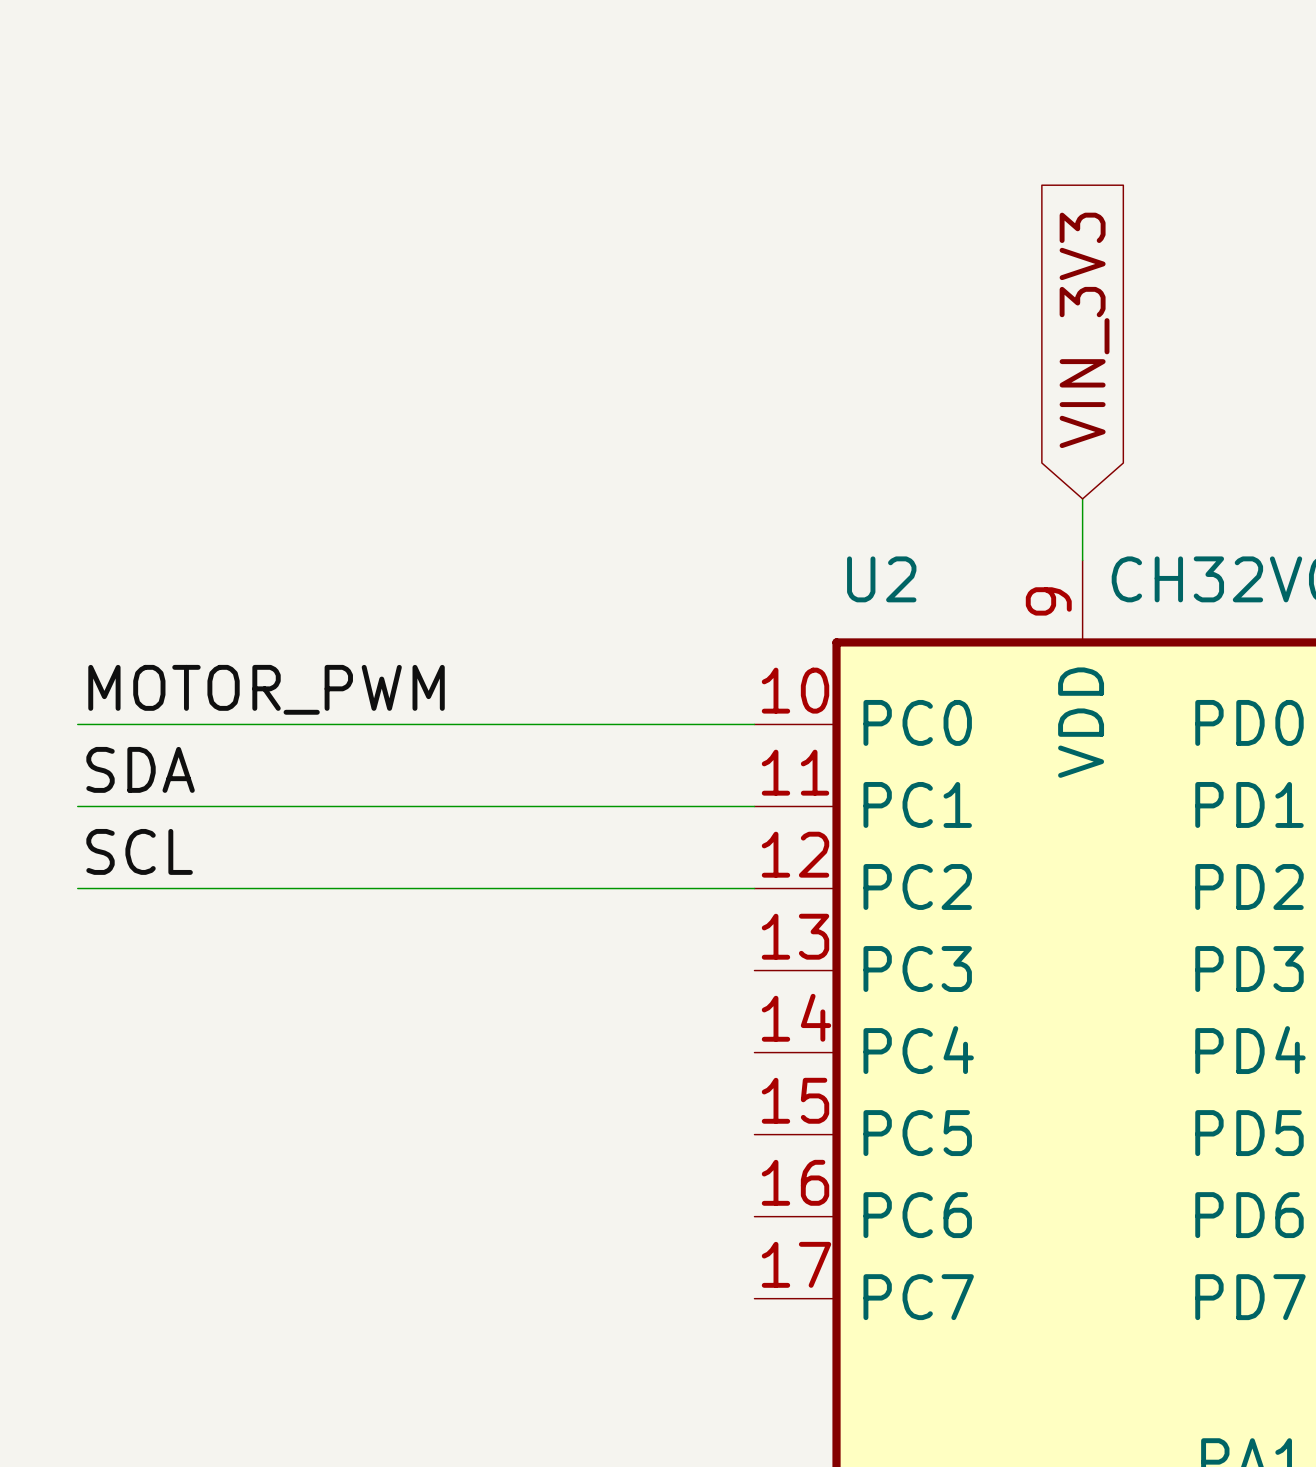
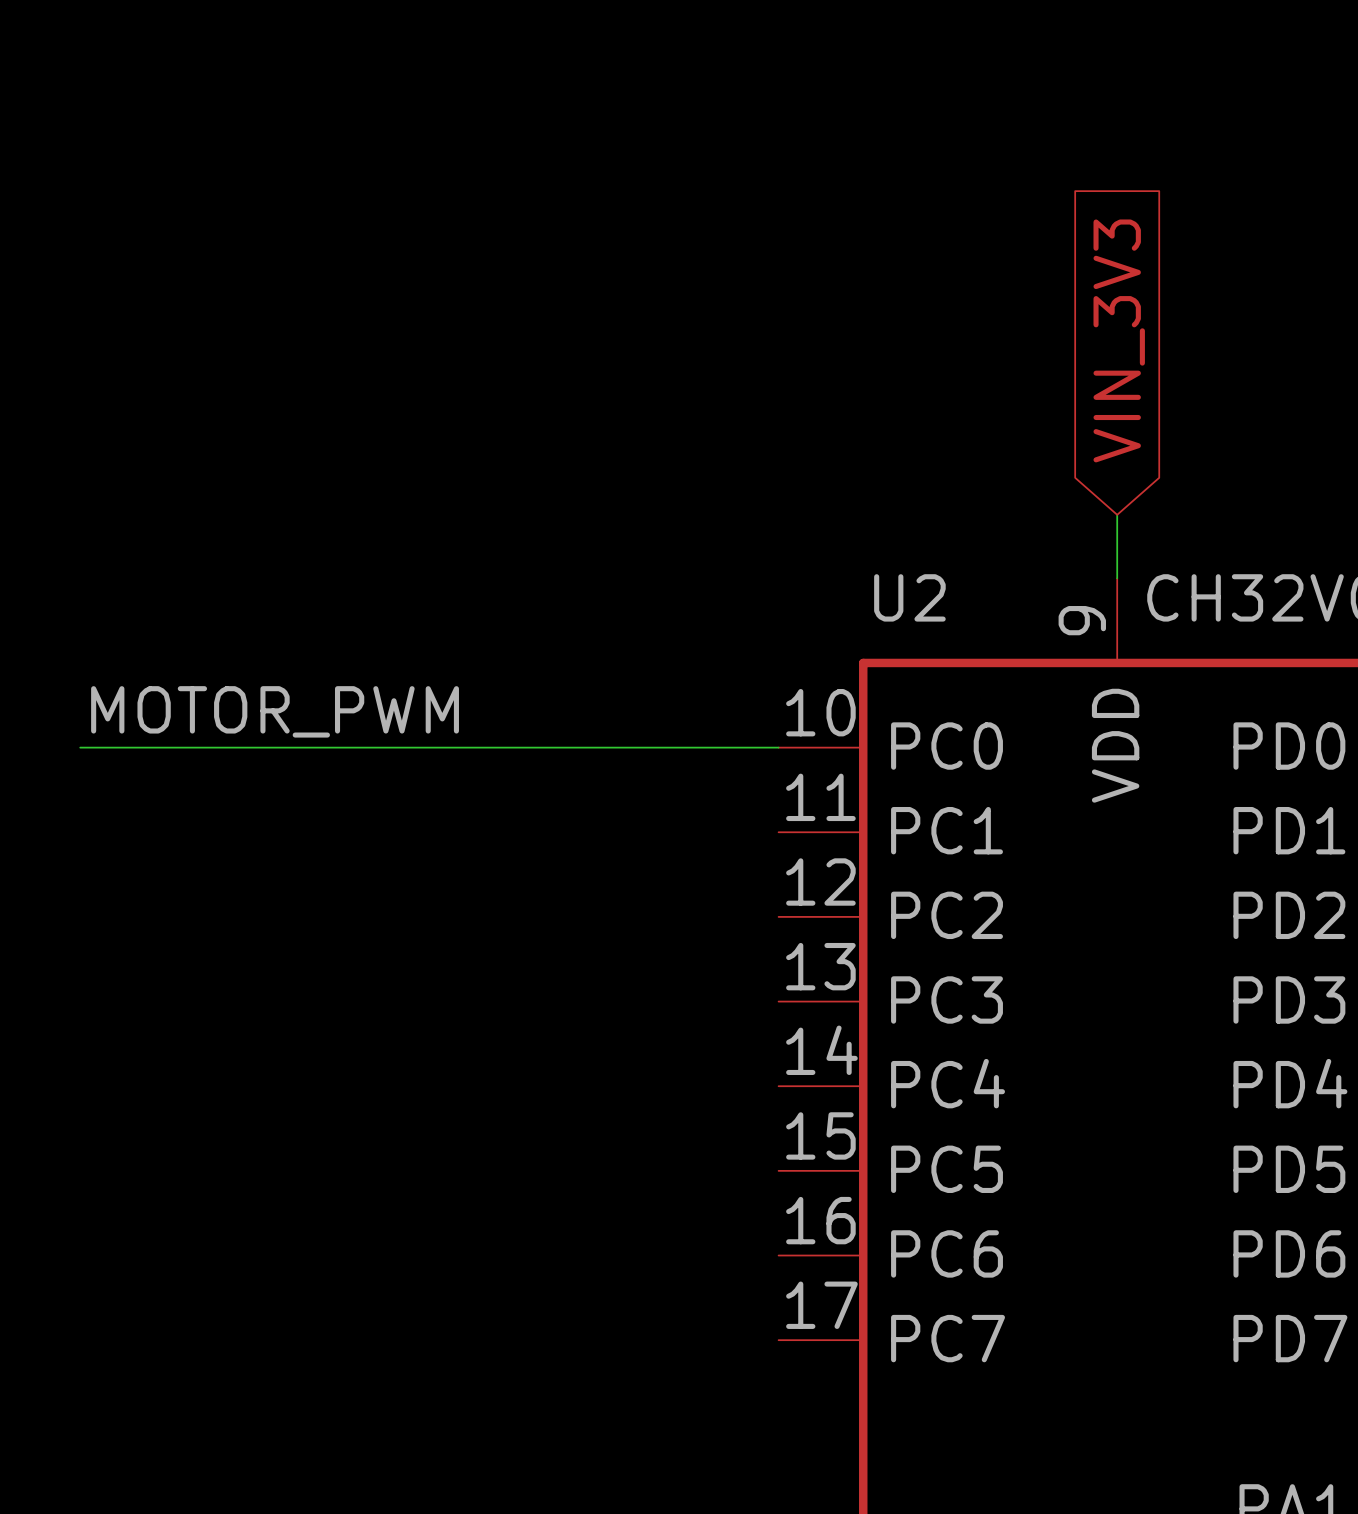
label: SDA (140, 769) -> none
wire: (77, 806) (754, 806) -> none
label: SCL (139, 851) -> none
wire: (77, 888) (754, 888) -> none

